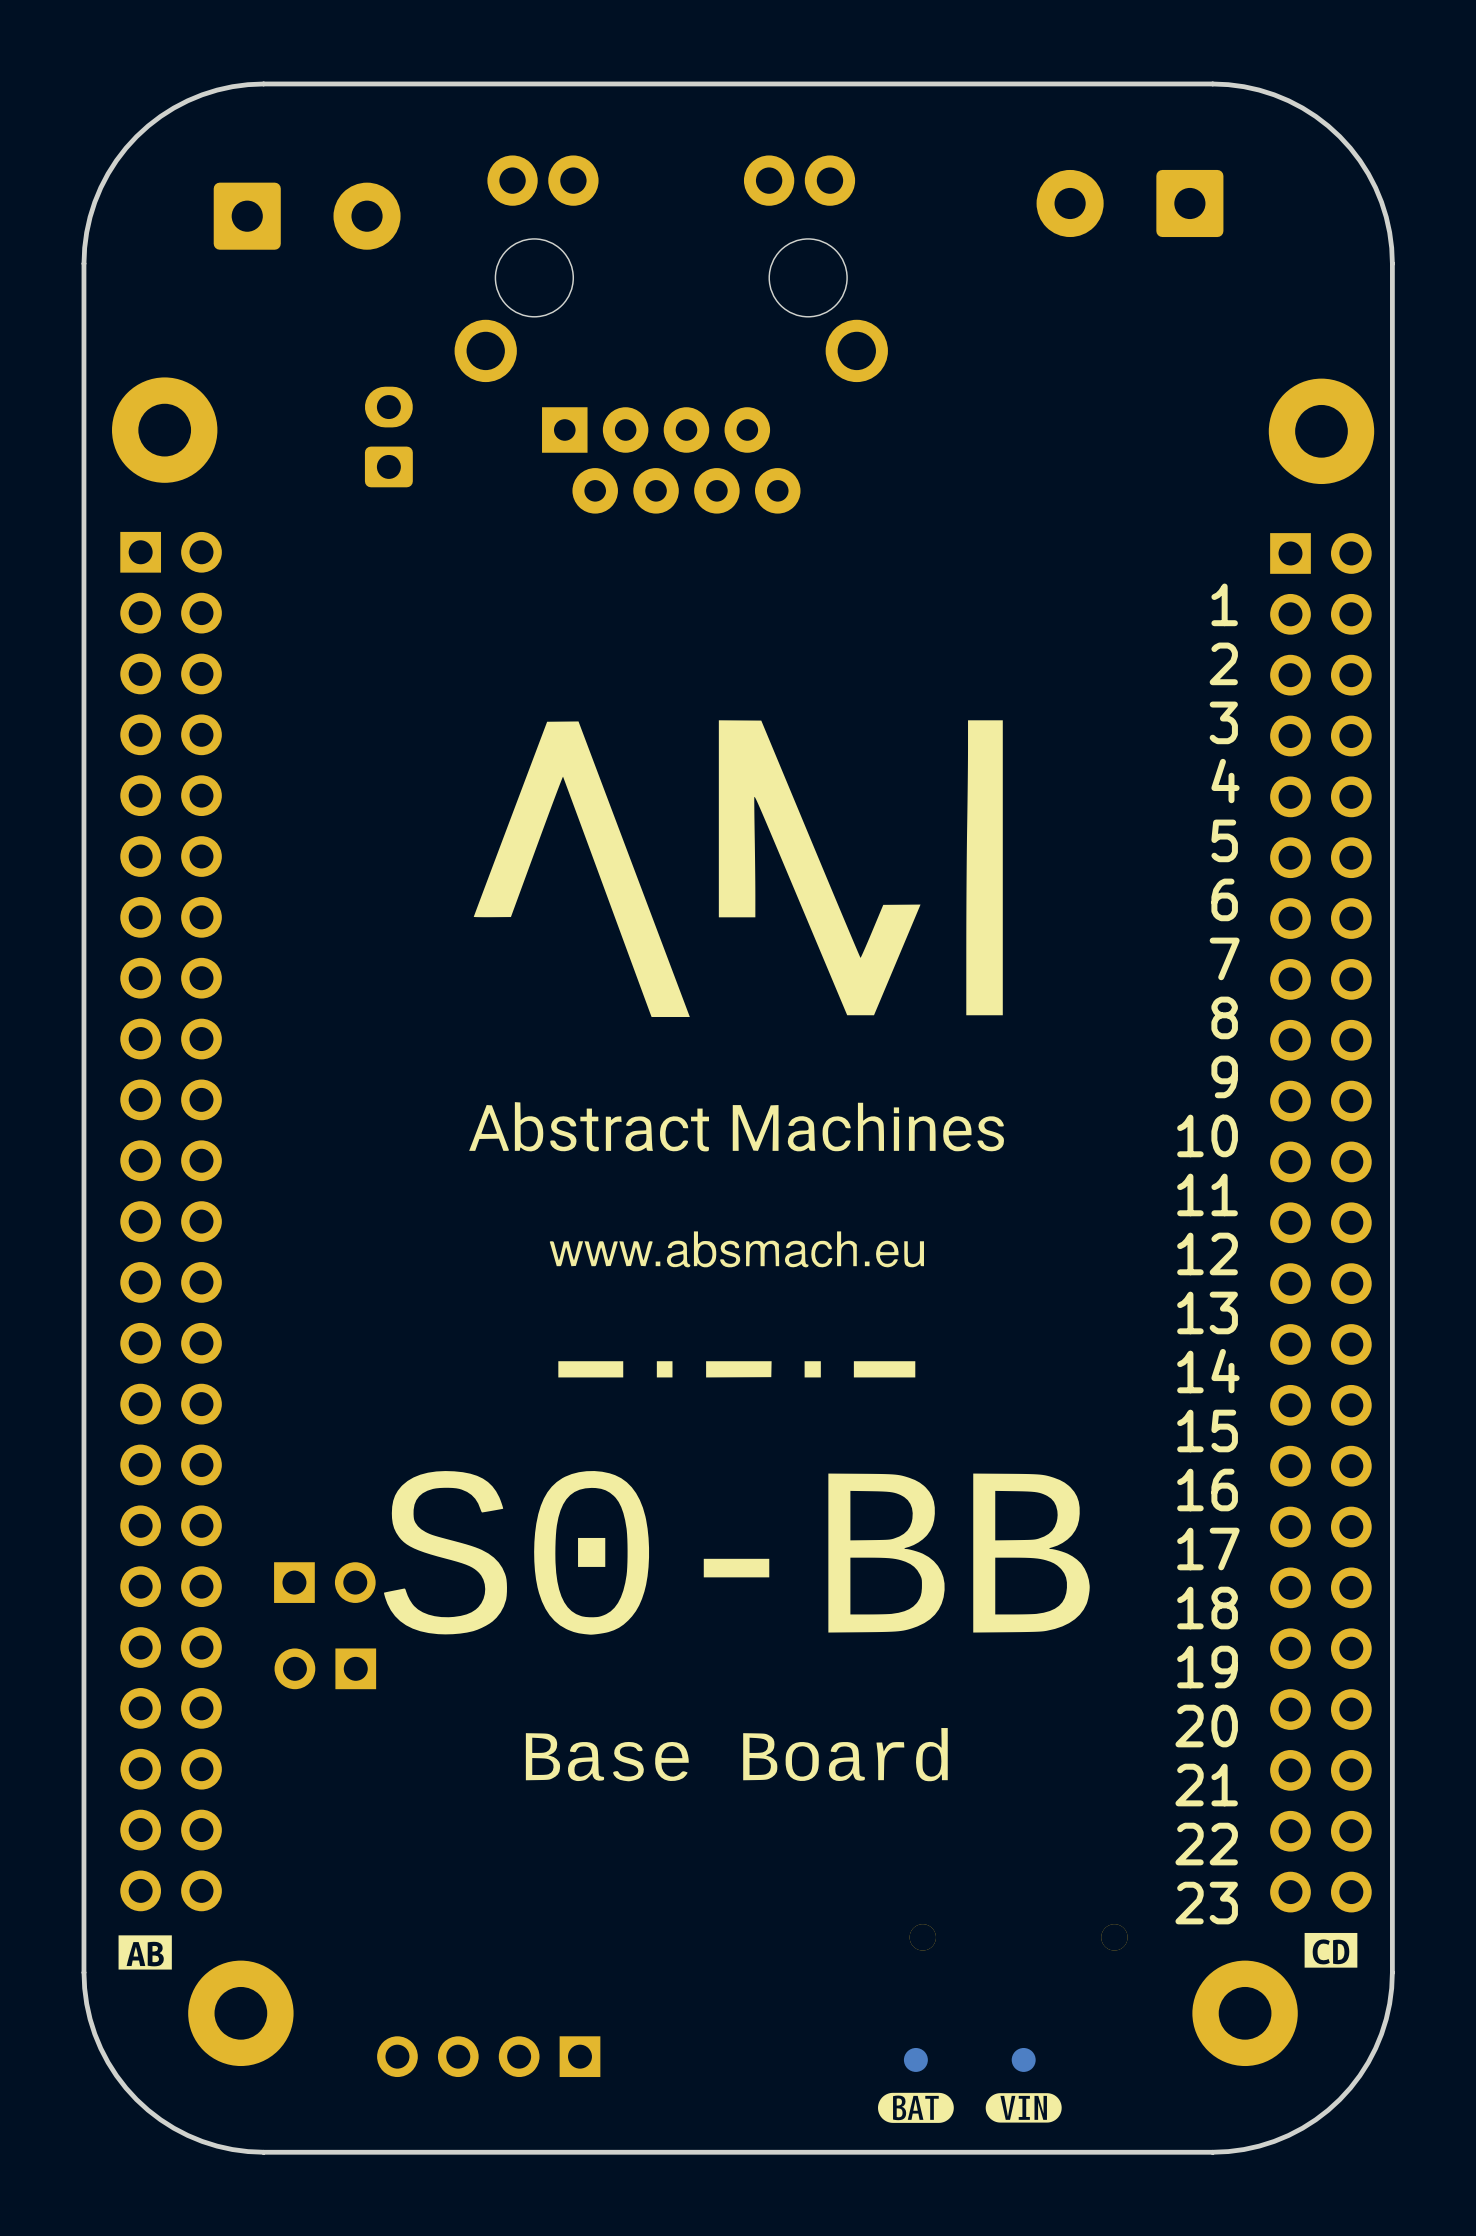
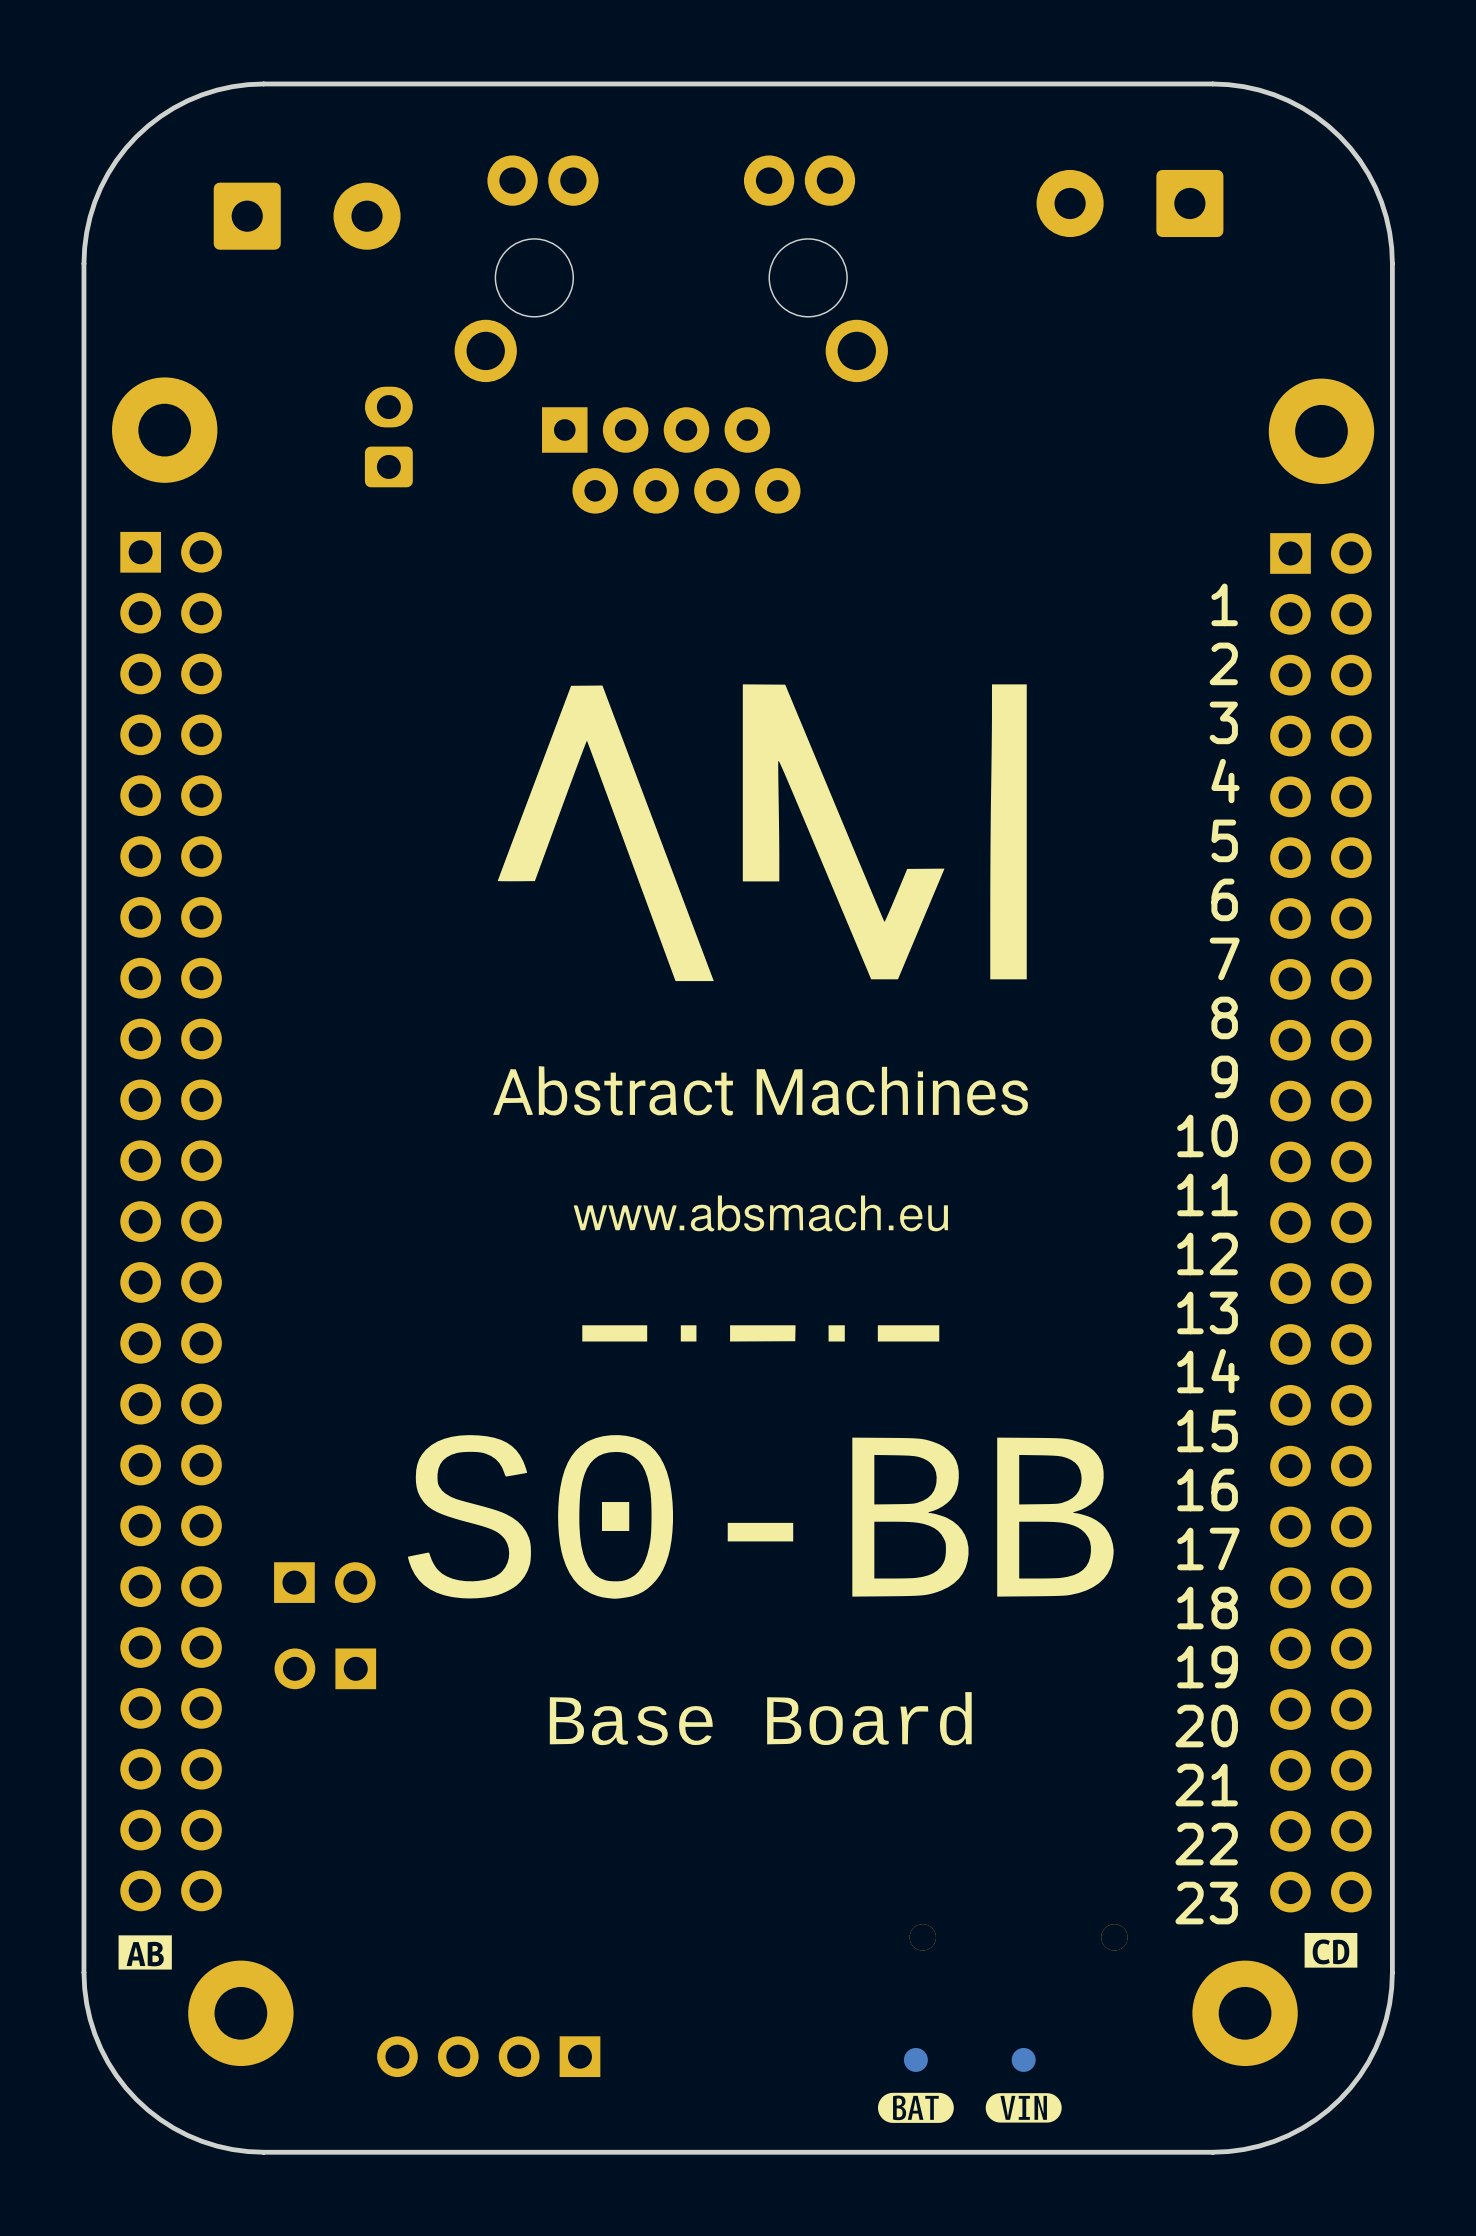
drawing position: (736, 1250) -> (760, 1214)

